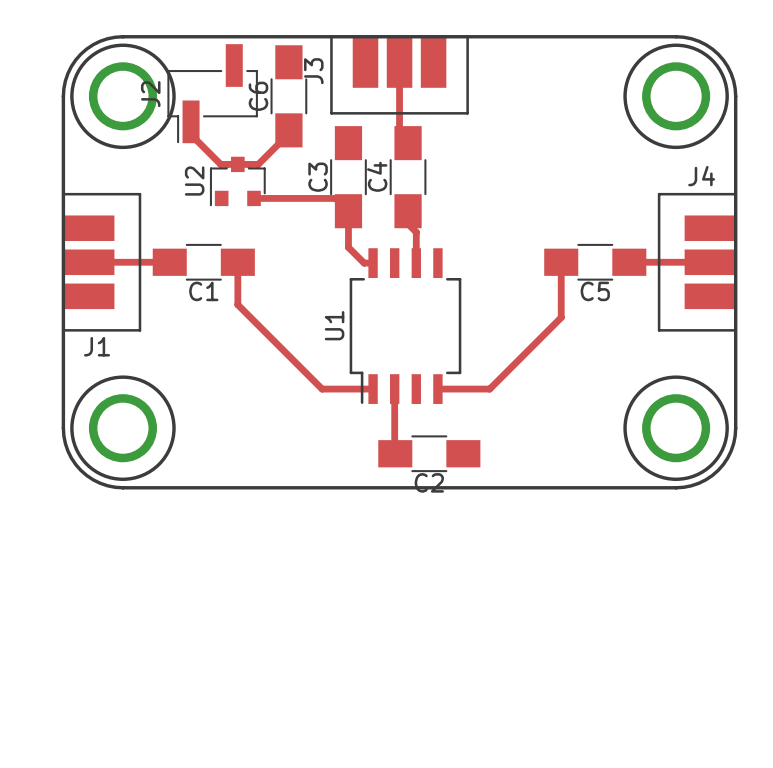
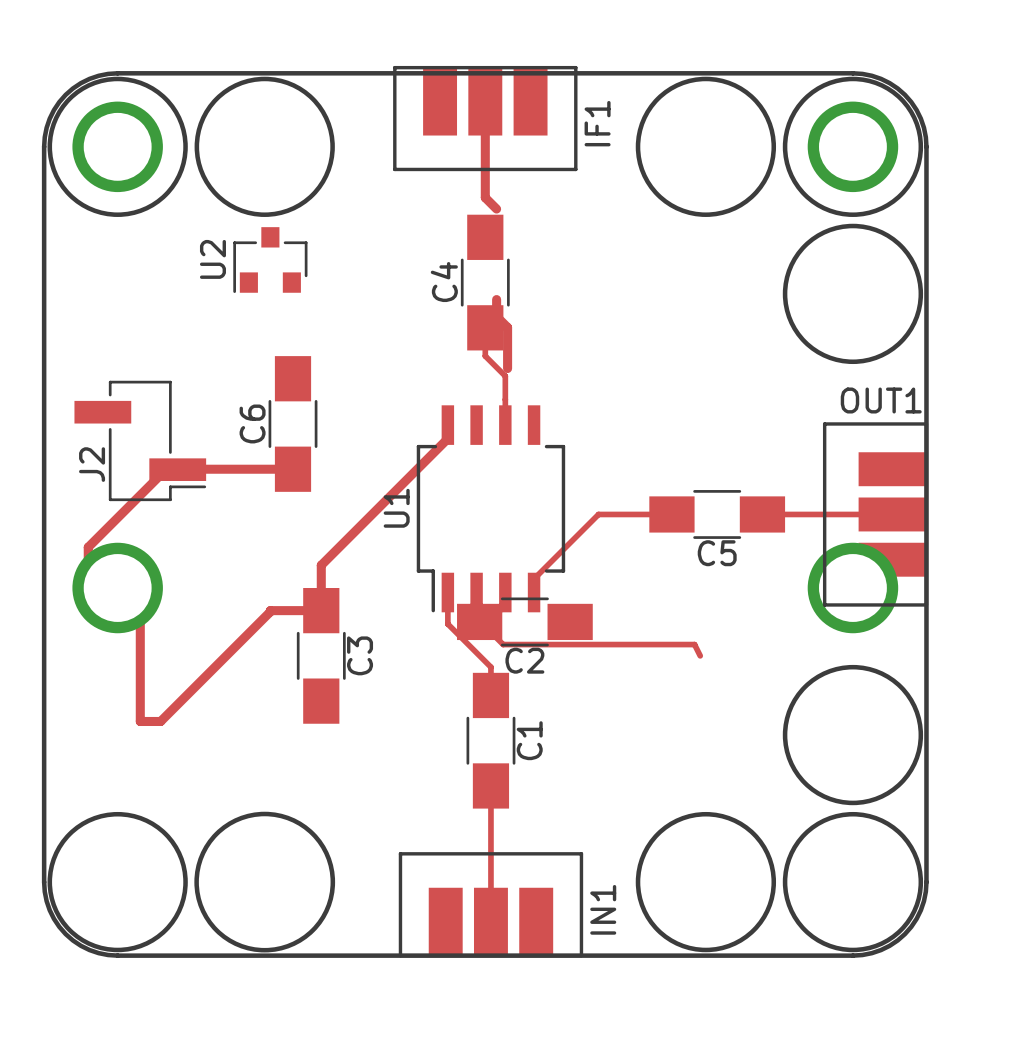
line: (122, 36) (676, 36) (691, 38) (712, 49) (727, 66) (733, 80) (735, 96) (735, 428) (733, 443) (723, 464) (705, 479) (691, 485) (676, 487) (122, 487) (107, 485) (86, 475) (71, 458) (65, 443) (63, 428) (63, 88) (71, 66) (80, 54) (100, 41) (122, 36) -> (117, 73) (89, 78) (65, 94) (49, 118) (44, 146) (44, 882) (49, 910) (65, 934) (89, 950) (117, 955) (852, 955) (881, 950) (904, 934) (920, 910) (926, 882) (926, 146) (920, 118) (904, 94) (881, 78) (852, 73) (117, 73)
drawing: none -> [194, 76, 335, 217]
drawing: none -> [635, 76, 924, 365]
J3 name: J3 (313, 71) -> IF1 (597, 123)
J2 rotation: 0° (212, 93) -> 90° counterclockwise (140, 440)
J2 position: (212, 93) -> (140, 440)
C6 position: (288, 96) -> (293, 423)
top track: (191, 121) (191, 134) (220, 164) (258, 164) (288, 133) (288, 130) -> none
C3 name position: C3 (318, 177) -> C3 (360, 655)
C3 position: (348, 177) -> (321, 655)
C4 position: (408, 177) -> (485, 282)
top track: (254, 198) (335, 198) (348, 211) (348, 247) (364, 263) (373, 263) -> none
top track: none -> (485, 327) (485, 356) (505, 376) (505, 425)
top track: (88, 262) (169, 262) -> none
J1: (101, 262) -> none
C1 rotation: 0° (203, 262) -> 90° clockwise (490, 740)
C1 position: (203, 262) -> (490, 740)
top track: (237, 262) (237, 304) (322, 389) (373, 389) (373, 378) -> none
top track: (561, 262) (561, 317) (489, 389) (437, 389) -> none
C5 position: (595, 262) -> (717, 514)
top track: (629, 262) (710, 262) -> none
J4: (697, 262) -> none
C1 name position: C1 (203, 291) -> C1 (529, 740)
top track: none -> (447, 425) (447, 438) (321, 565) (321, 610) (270, 610) (160, 721) (140, 721) (140, 578)
U1 position: (405, 326) -> (490, 508)
top track: none -> (293, 469) (165, 469) (88, 547) (88, 578)
top track: none -> (671, 514) (598, 514) (534, 578) (534, 592)
top track: none -> (762, 514) (892, 514)
OUT1: none -> (875, 514)
drawing: [70, 375, 176, 481] -> none
drawing: [623, 375, 729, 481] -> none
top track: (394, 389) (395, 453) -> none
top track: none -> (447, 592) (447, 624) (490, 667) (490, 695)
top track: none -> (476, 592) (476, 617) (503, 644) (694, 644) (700, 655)
drawing: none -> [635, 664, 924, 953]
top track: none -> (490, 785) (490, 921)
drawing: none -> [47, 811, 336, 953]
IN1: none -> (490, 904)

